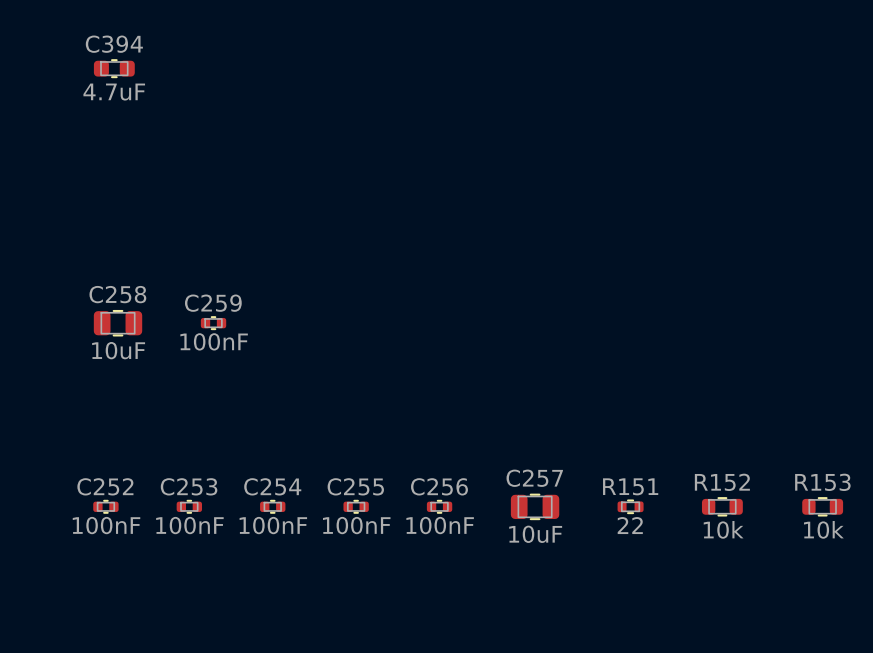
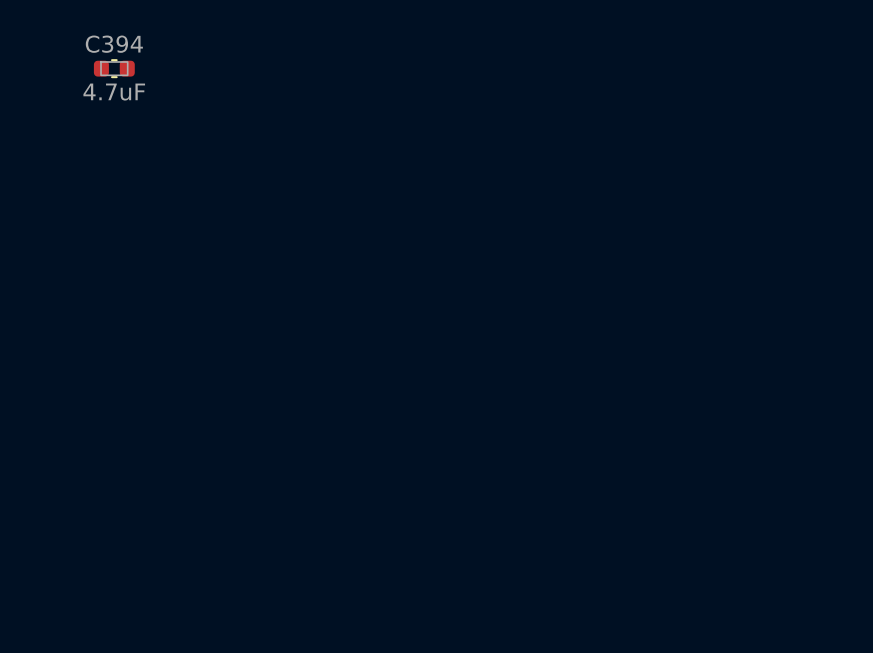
C258: 10uF (118, 323) -> none
C259: 100nF (213, 323) -> none
C252: 100nF (105, 506) -> none
C253: 100nF (189, 506) -> none
C254: 100nF (272, 506) -> none
C255: 100nF (356, 506) -> none
C256: 100nF (439, 506) -> none
C257: 10uF (535, 506) -> none
R151: 22 (630, 506) -> none
R152: 10k (722, 506) -> none
R153: 10k (822, 506) -> none

